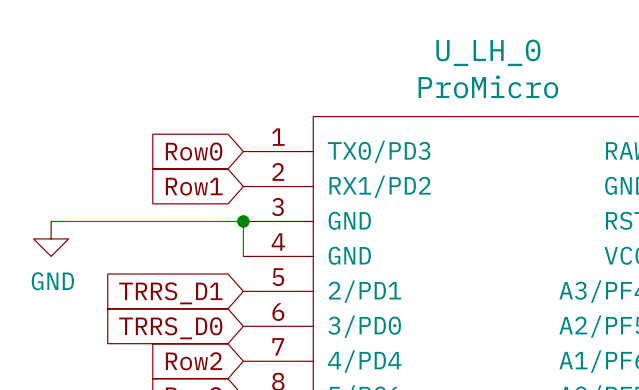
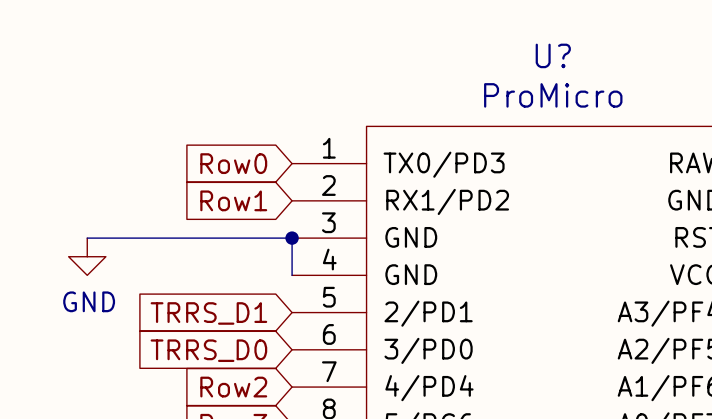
U_LH_0 name: U_LH_0 (488, 52) -> U? (553, 55)

